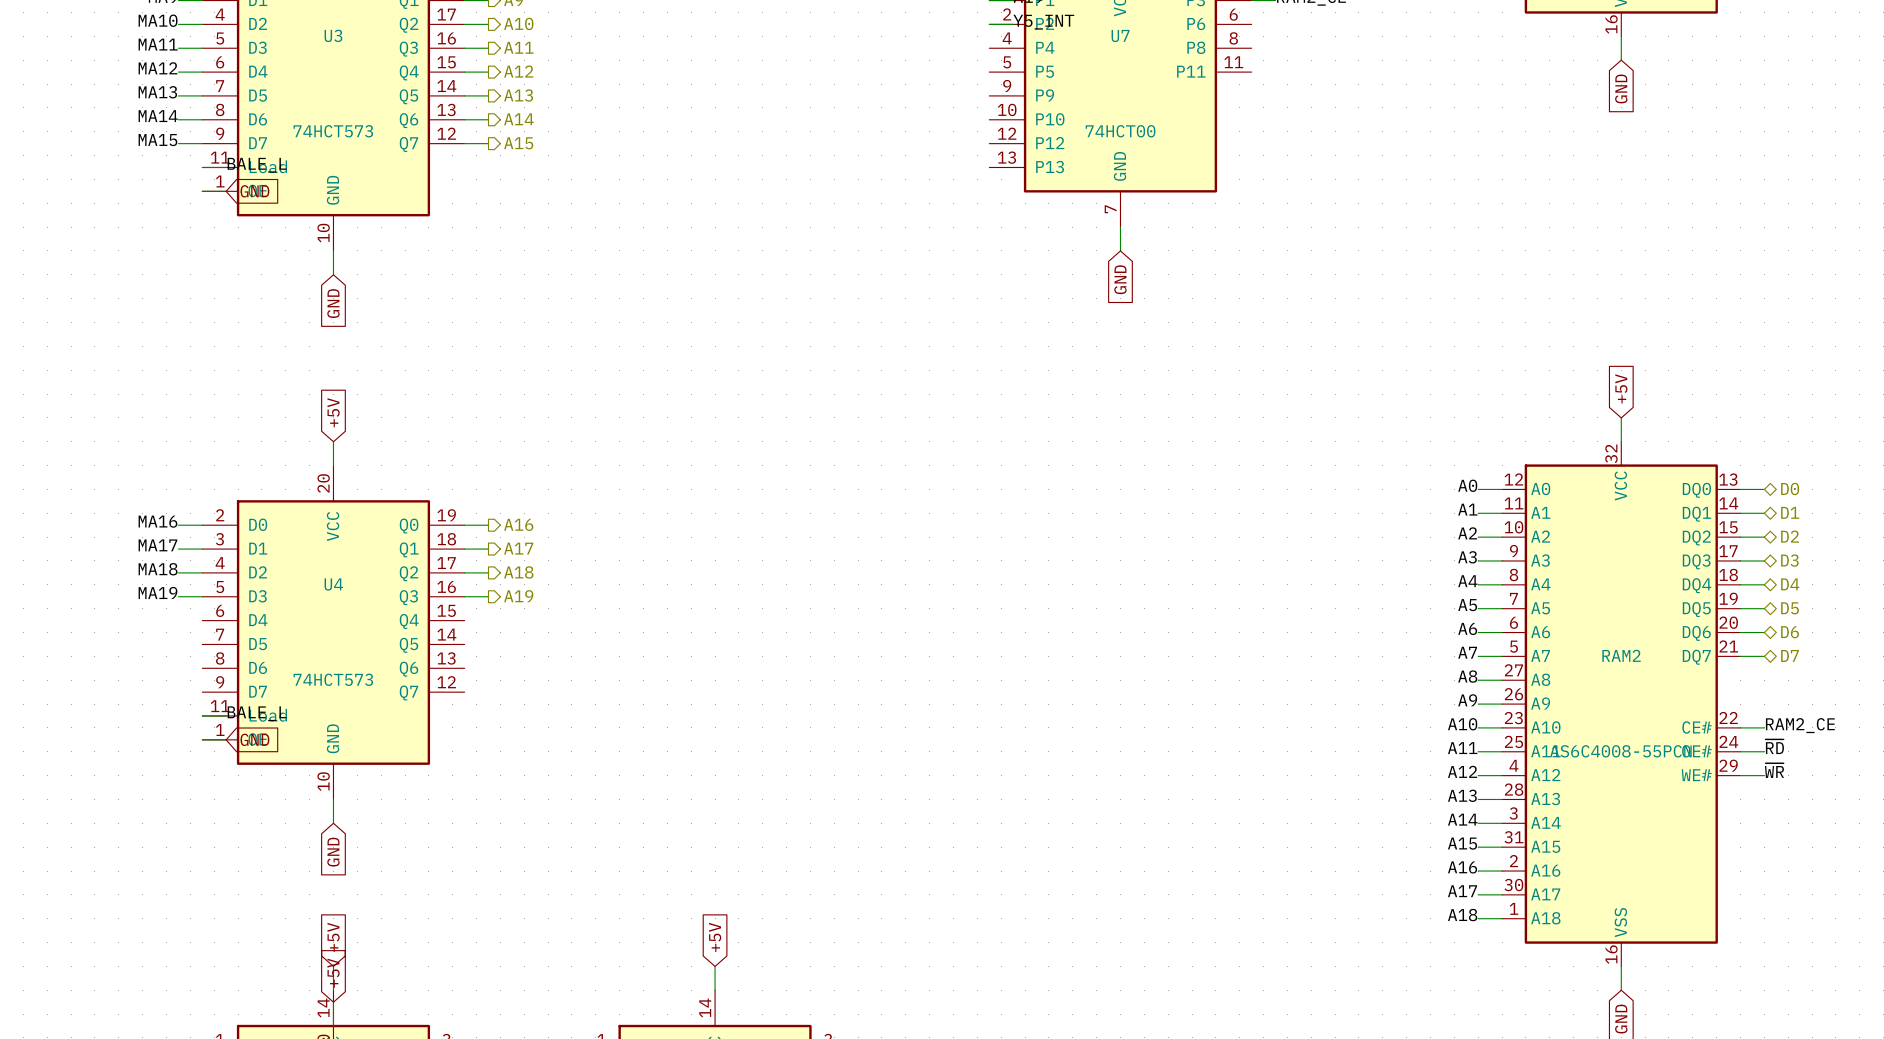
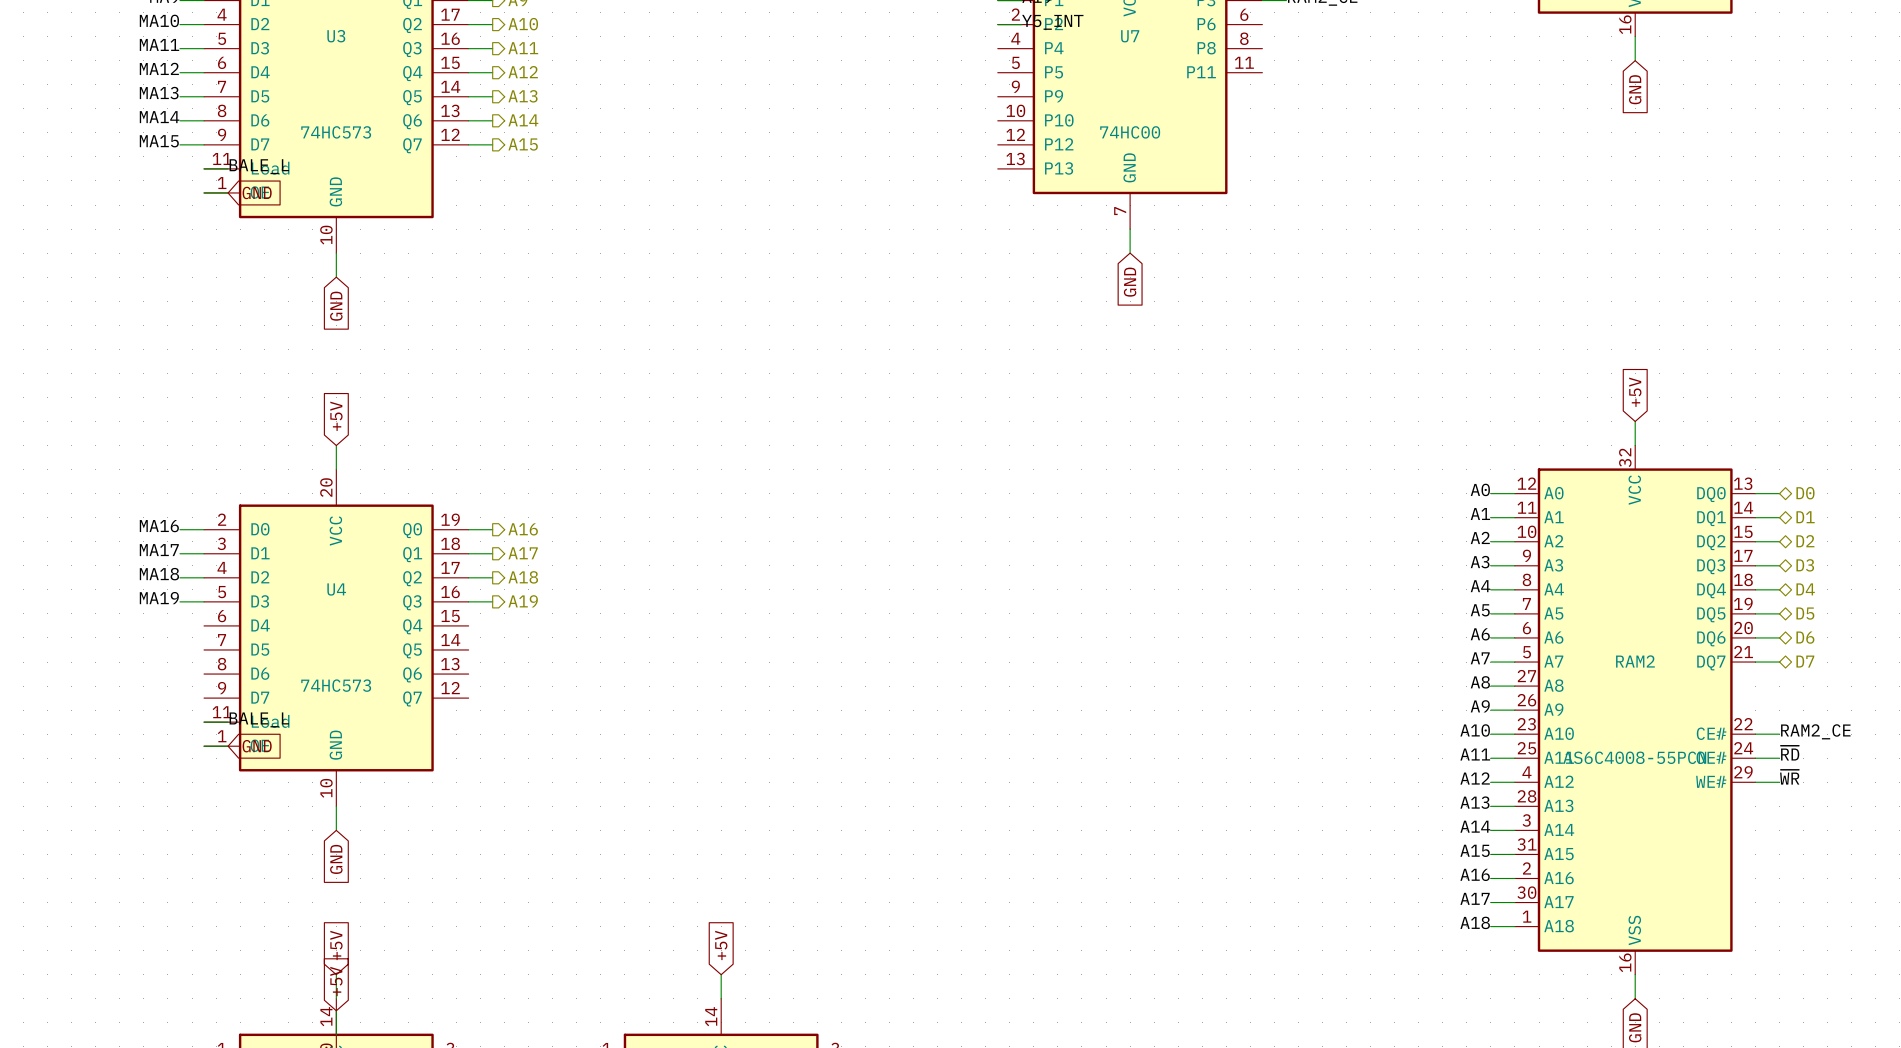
U3 value: 74HCT573 (333, 131) -> 74HC573 (336, 132)
U7 value: 74HCT00 (1120, 131) -> 74HC00 (1130, 132)
U4 value: 74HCT573 (333, 679) -> 74HC573 (336, 685)

